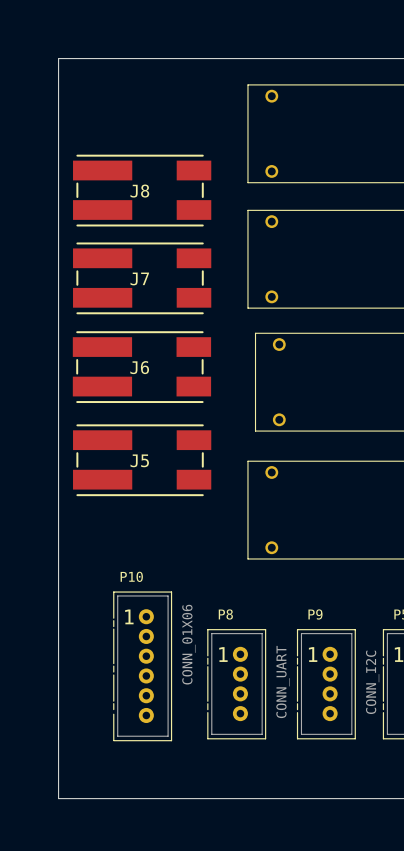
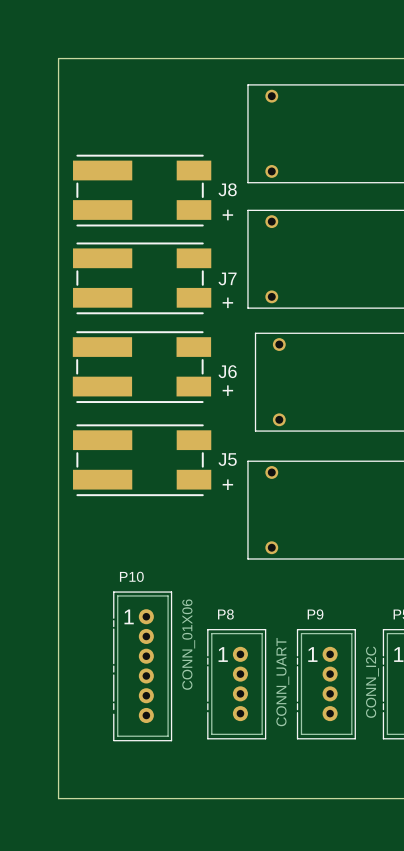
J8 name position: J8 (139, 191) -> J8 (227, 189)
text: none -> + (227, 215)
J7 name position: J7 (139, 278) -> J7 (227, 278)
text: none -> + (227, 302)
J6 name position: J6 (139, 367) -> J6 (227, 371)
text: none -> + (227, 390)
J5 name position: J5 (139, 460) -> J5 (227, 459)
text: none -> + (227, 484)

